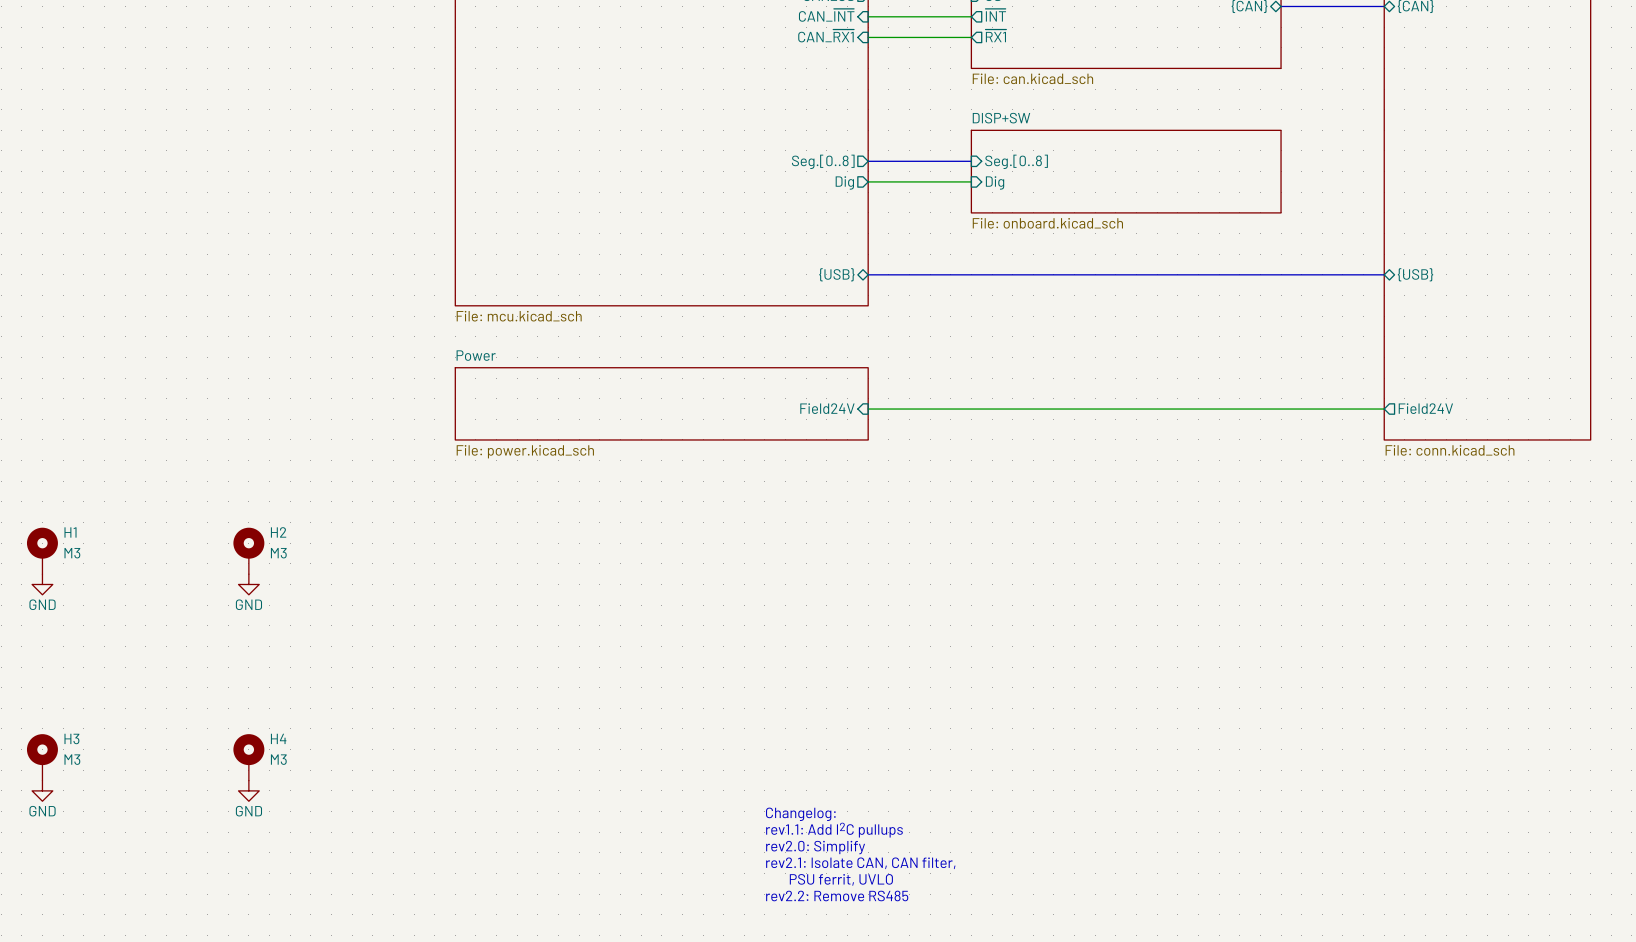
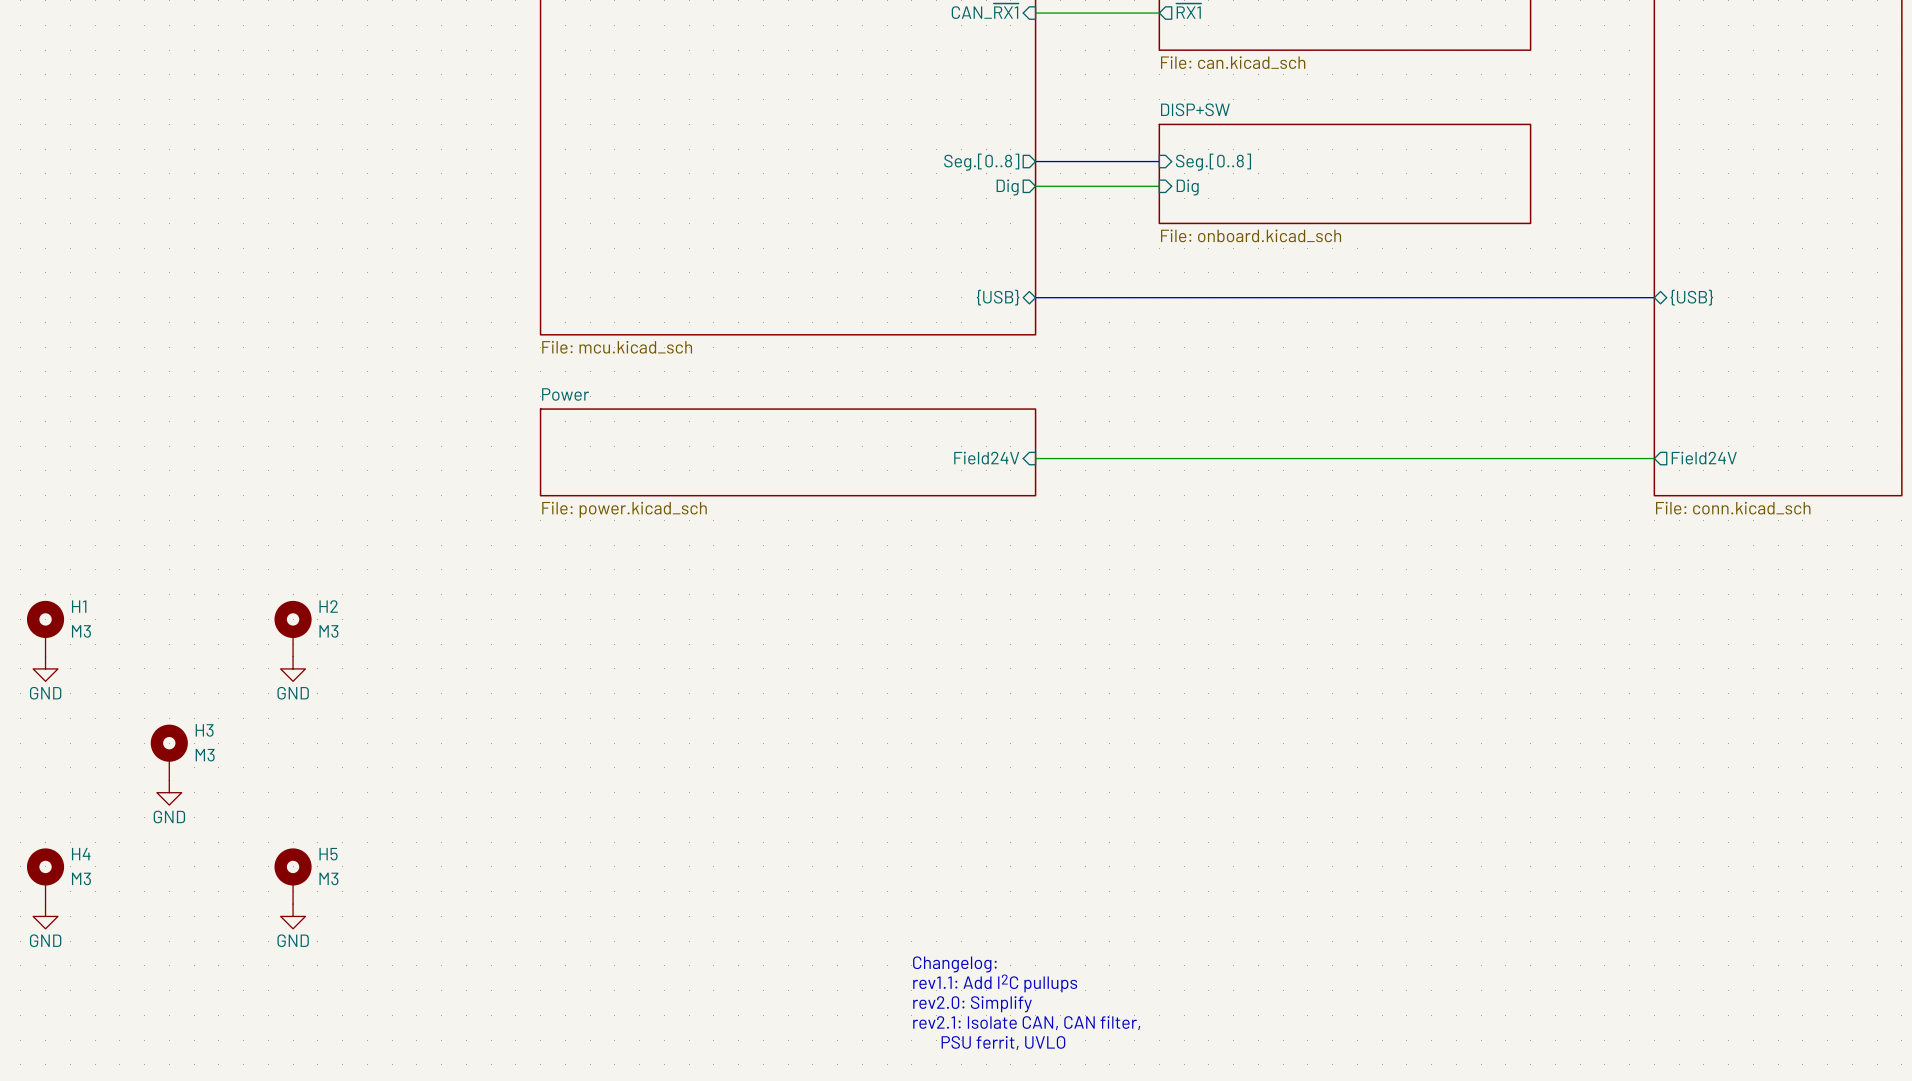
H3: none -> M3 (169, 752)
power symbol: none -> GND (169, 792)
H3 name: H3 (71, 738) -> H4 (81, 854)
H4 name: H4 (278, 738) -> H5 (328, 854)
text: Changelog: (800, 814) -> none
text: rev1.1: Add I2C pullups (834, 830) -> Changelog: (954, 964)
text: rev2.0: Simplify (815, 847) -> rev1.1: Add I2C pullups (995, 983)
text: rev2.1: Isolate CAN, CAN filter, (860, 863) -> rev2.0: Simplify (972, 1004)
text: PSU ferrit, UVLO (841, 879) -> rev2.1: Isolate CAN, CAN filter, (1026, 1023)
text: rev2.2: Remove RS485 (837, 895) -> PSU ferrit, UVLO (1003, 1043)

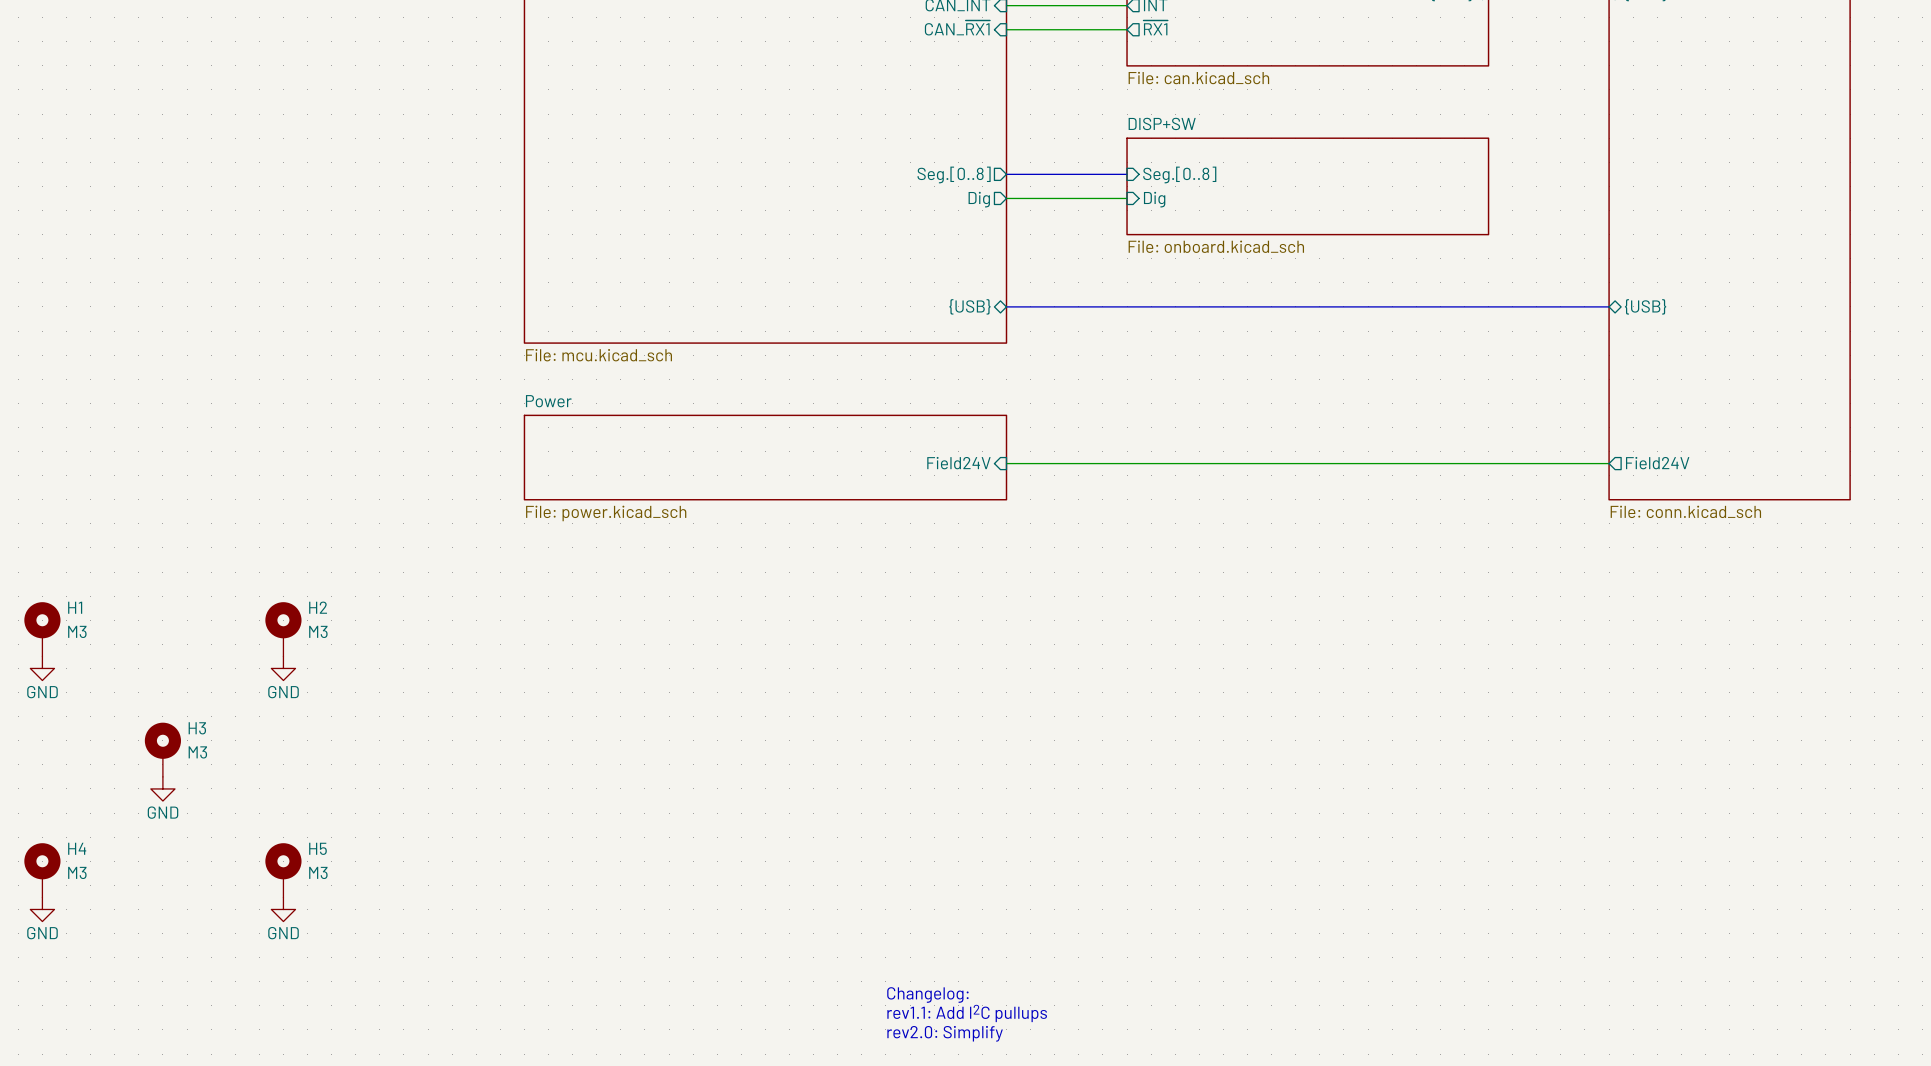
text: Changelog: (954, 964) -> none
text: rev1.1: Add I2C pullups (995, 983) -> none
text: rev2.0: Simplify (972, 1004) -> Changelog: (927, 995)
text: rev2.1: Isolate CAN, CAN filter, (1026, 1023) -> rev1.1: Add I2C pullups (967, 1013)
text: PSU ferrit, UVLO (1003, 1043) -> rev2.0: Simplify (945, 1033)

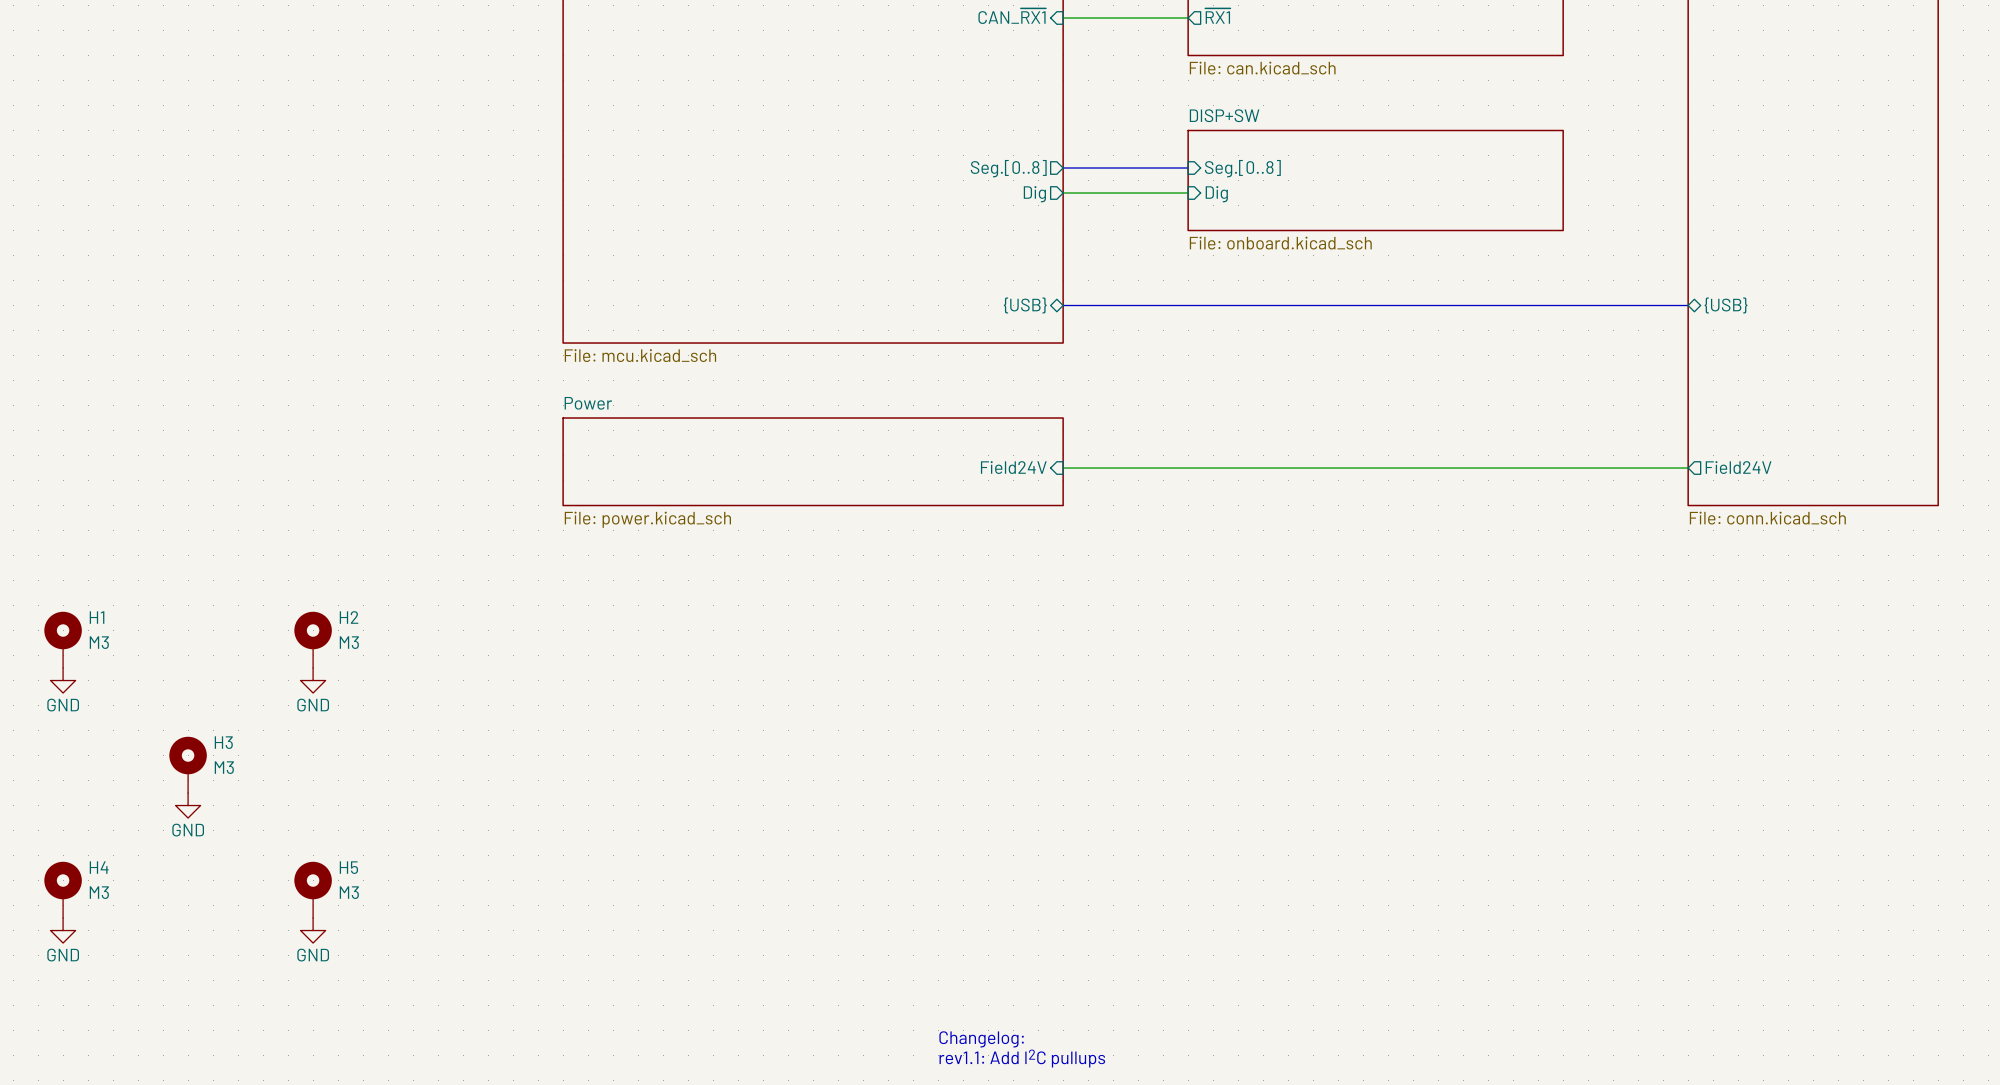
text: Changelog: (927, 995) -> none
text: rev1.1: Add I2C pullups (967, 1013) -> Changelog: (981, 1039)
text: rev2.0: Simplify (945, 1033) -> rev1.1: Add I2C pullups (1022, 1058)

